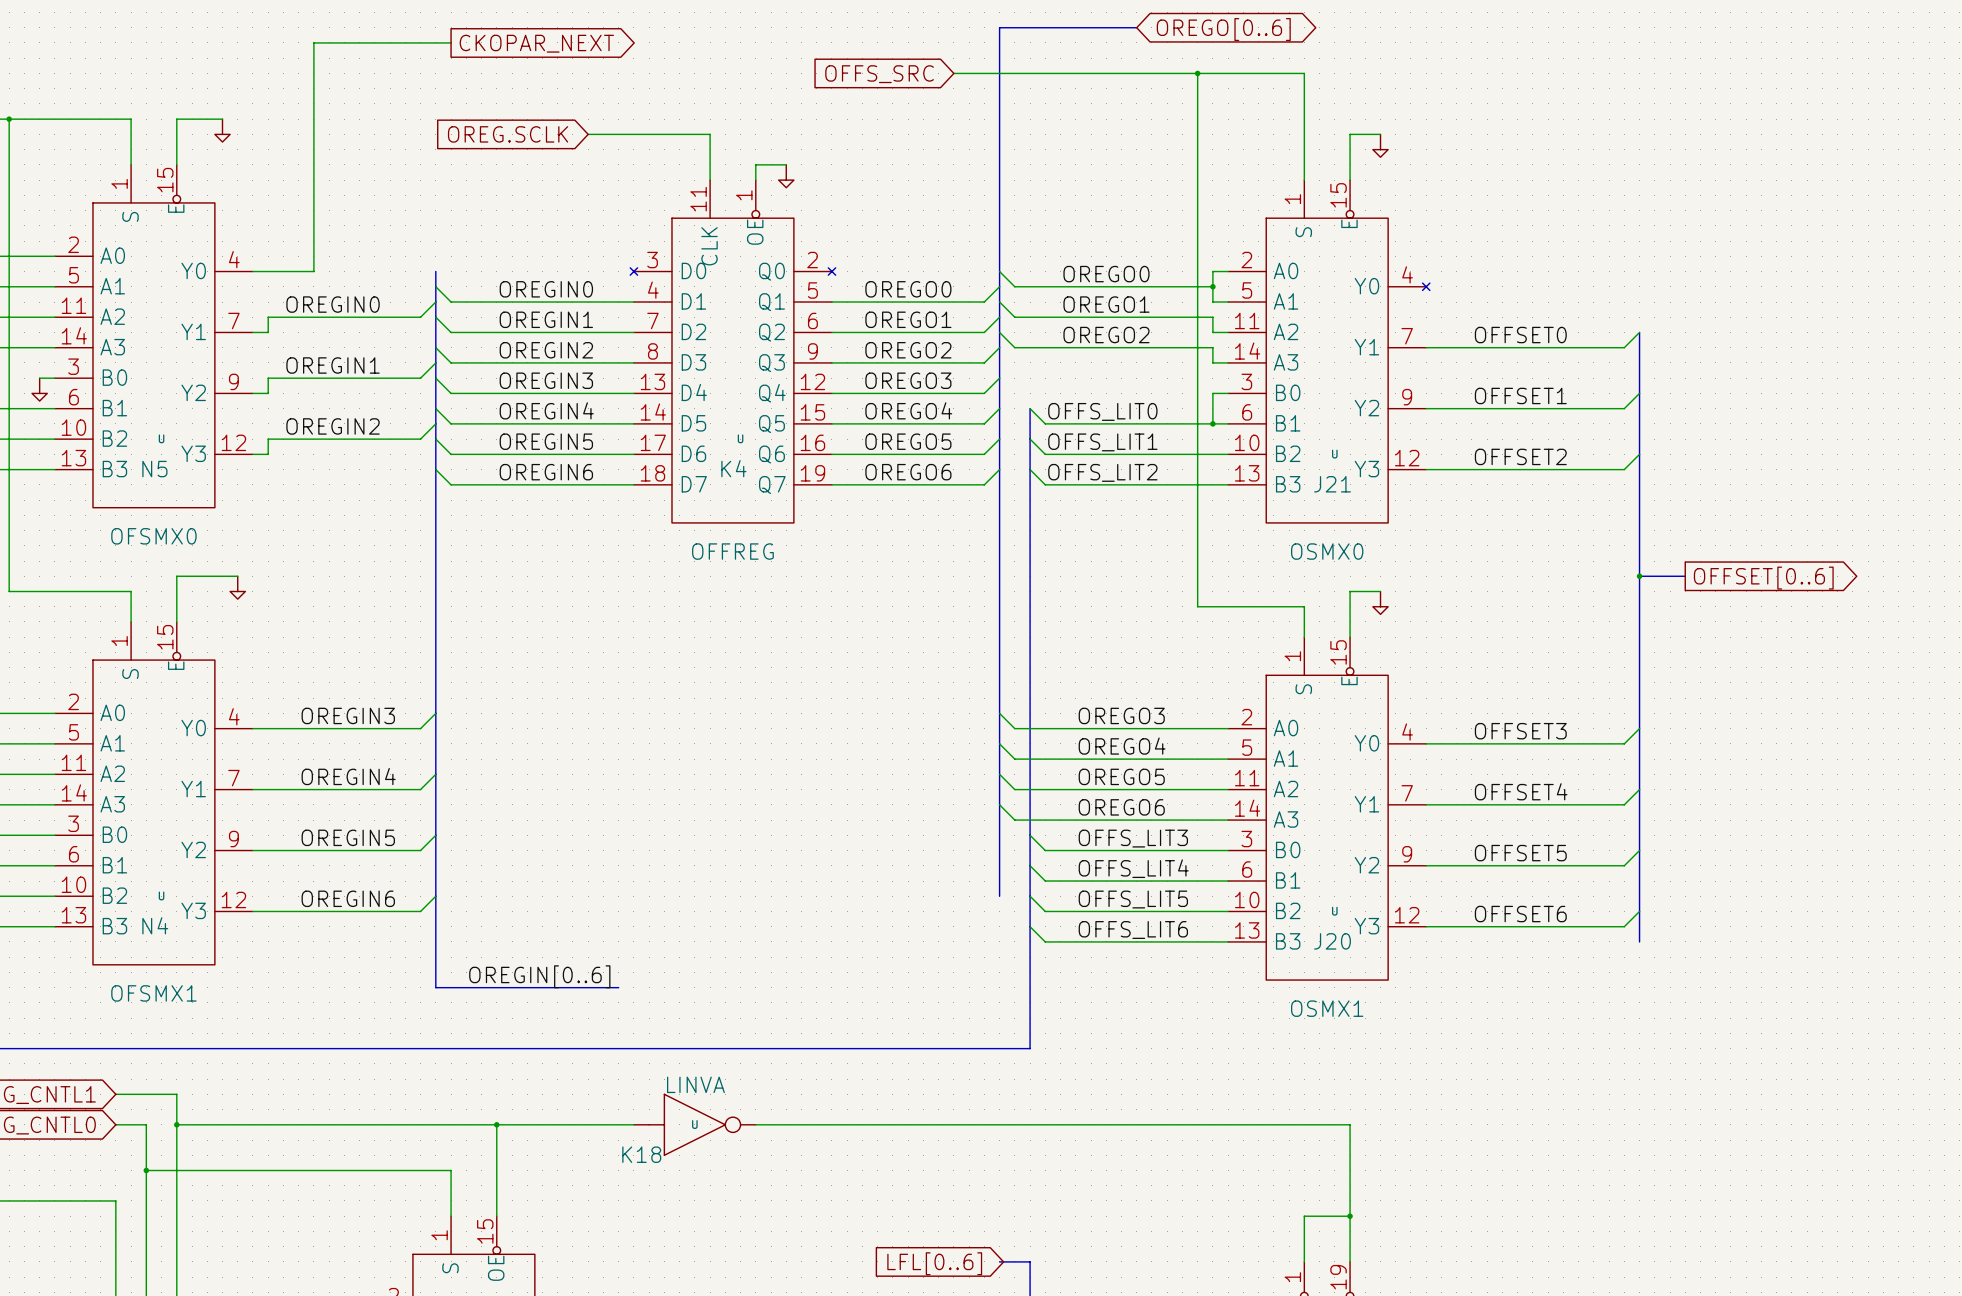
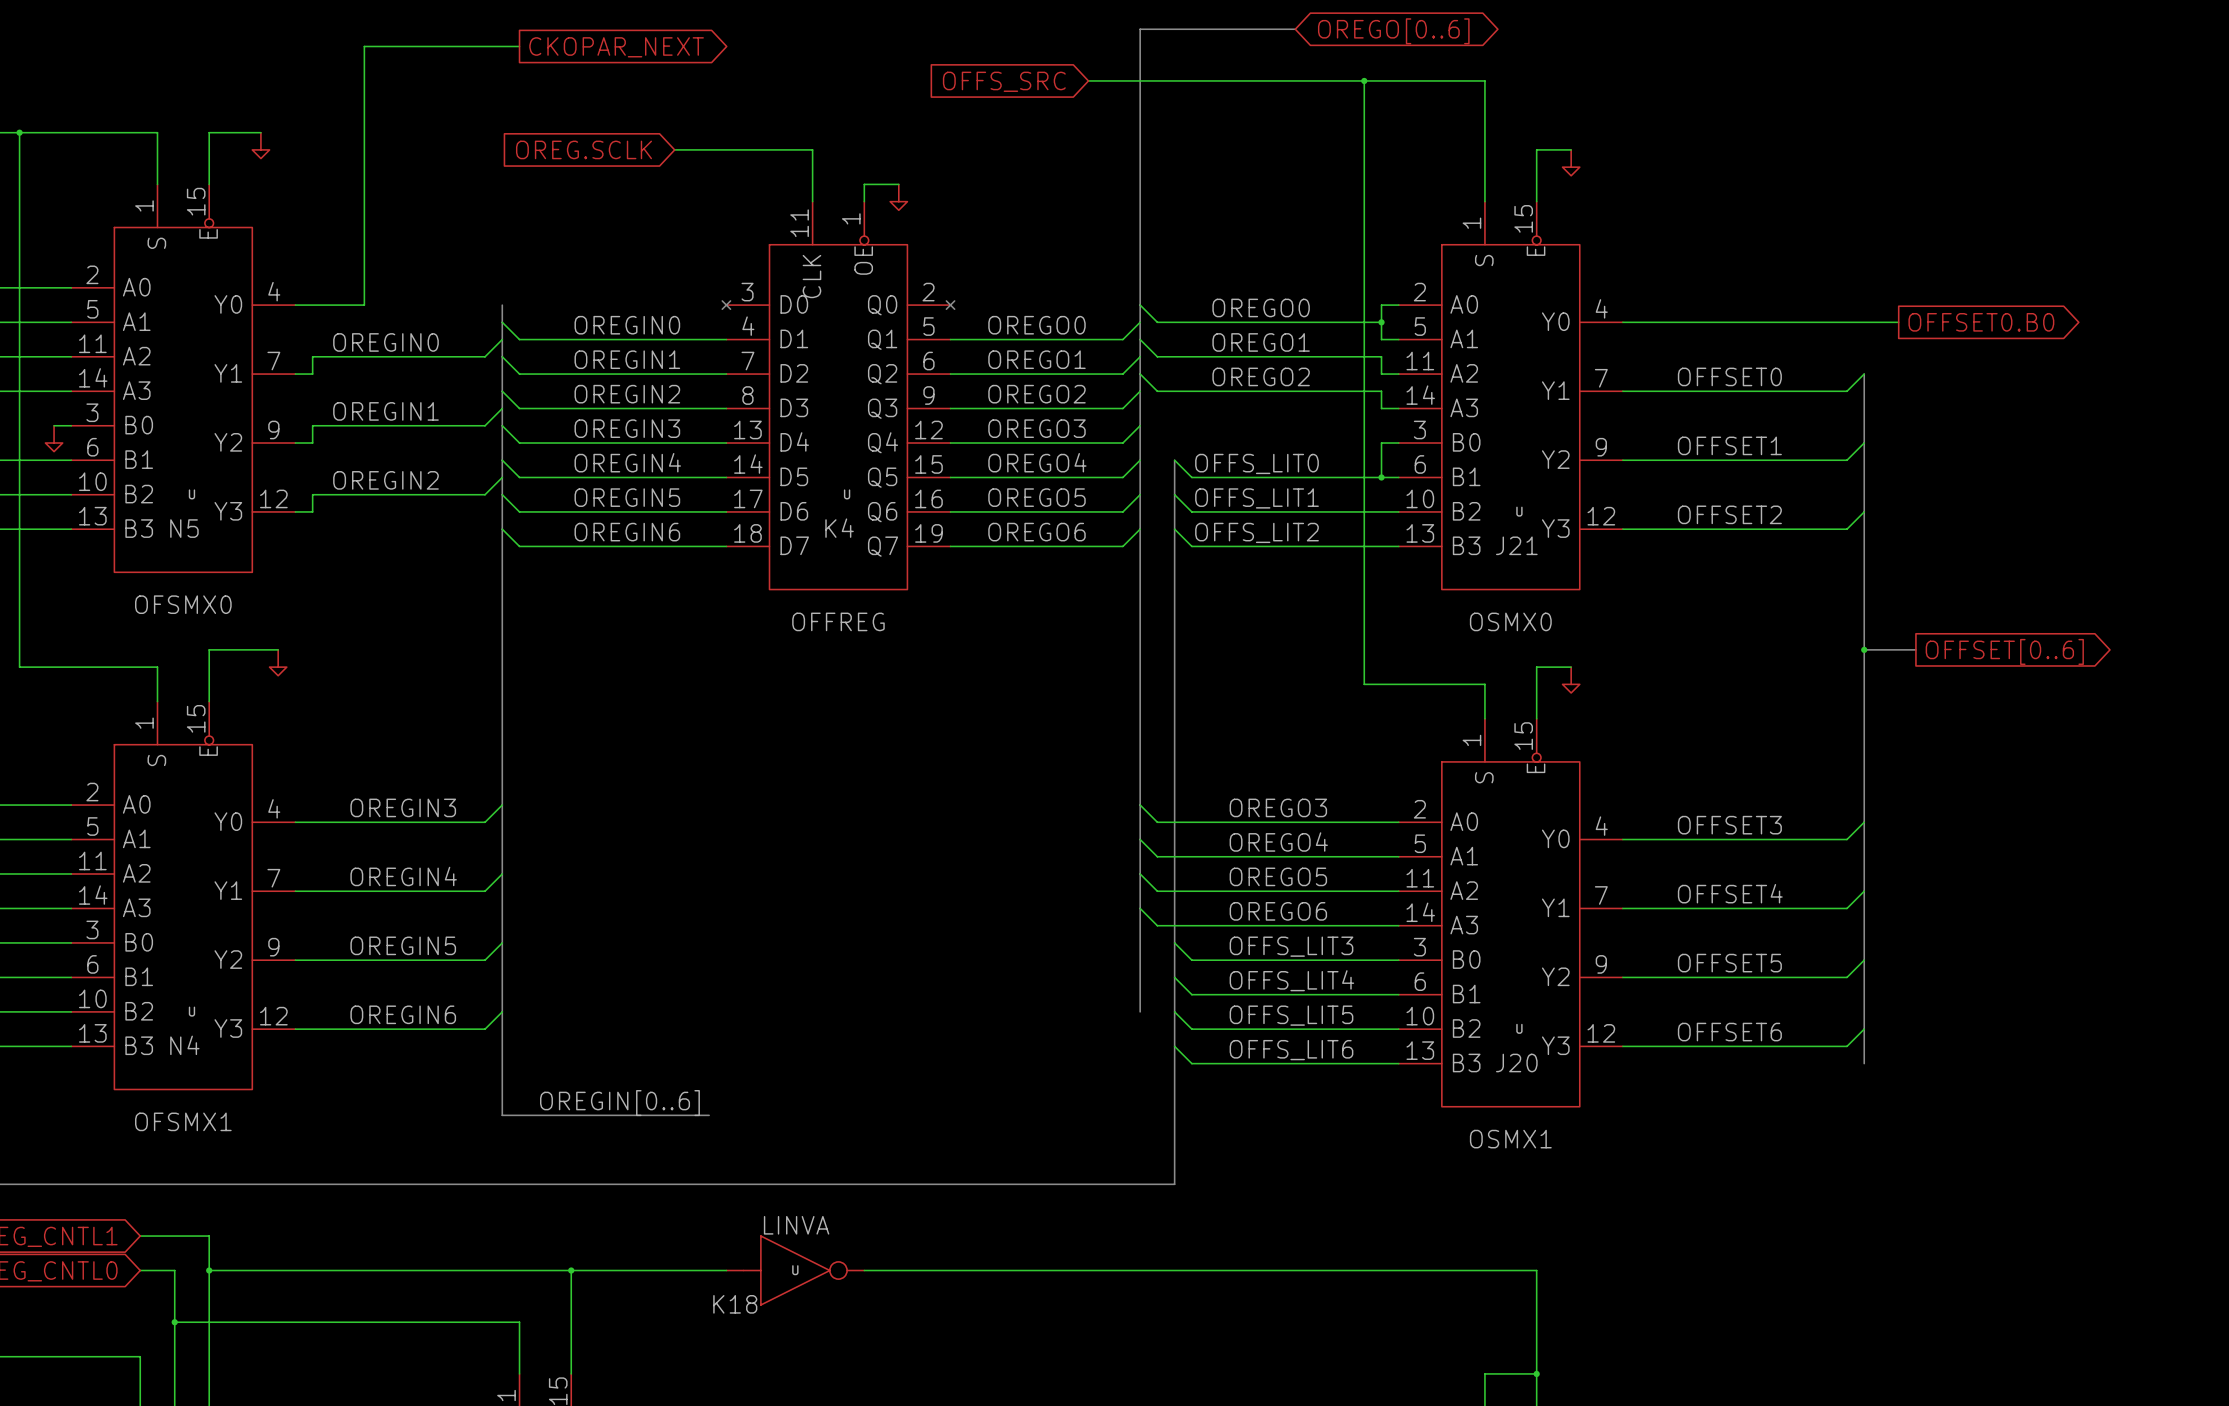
wire: none -> (1622, 322) (1898, 322)
no-connect mark: (1426, 286) -> none
global label: none -> OFFSET0.B0 (1981, 322)

